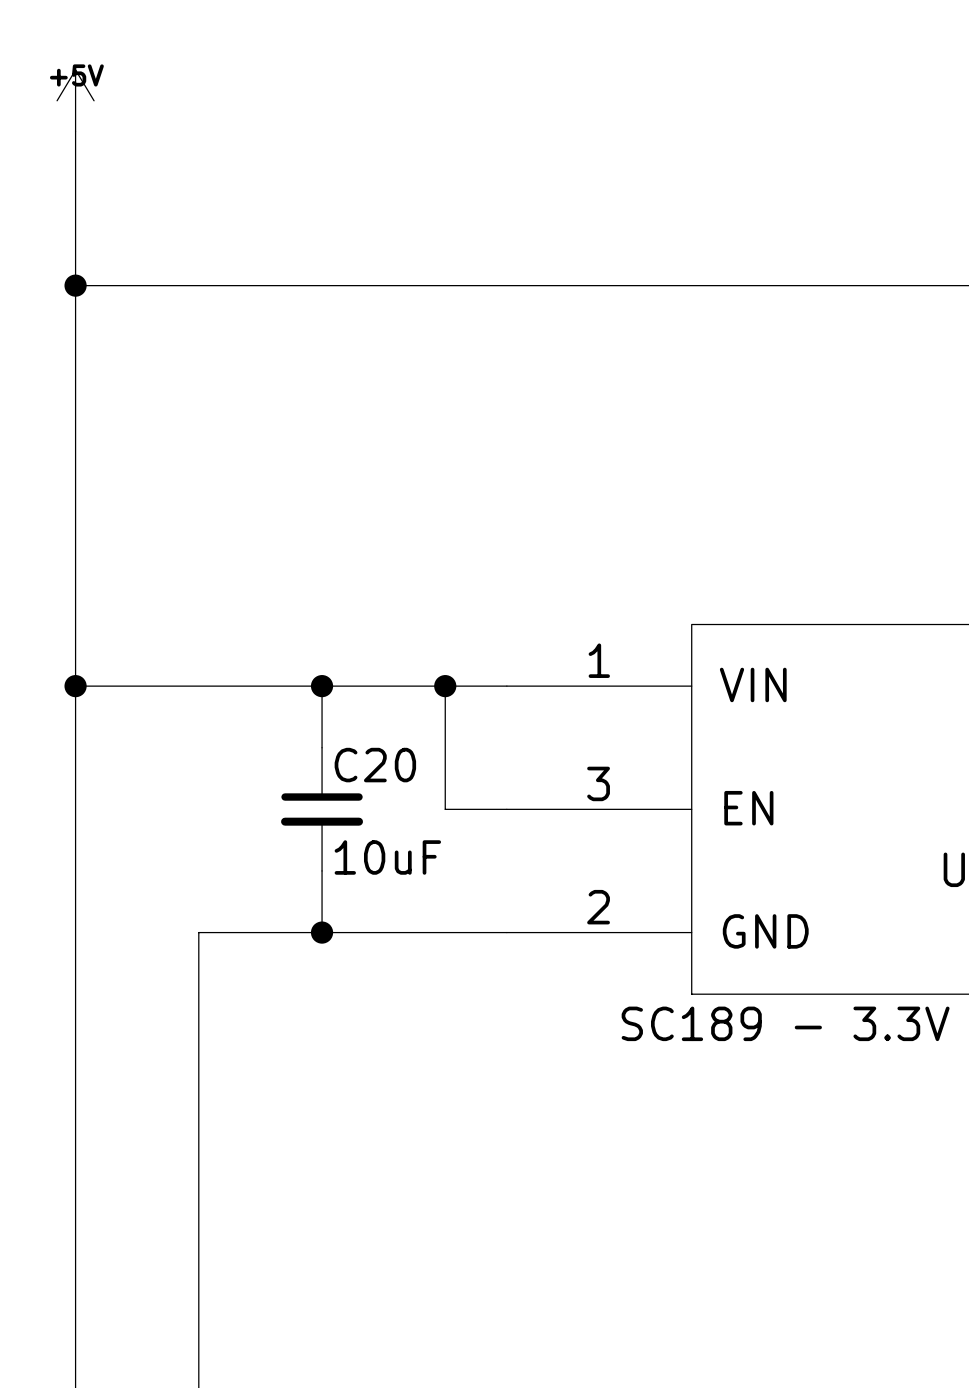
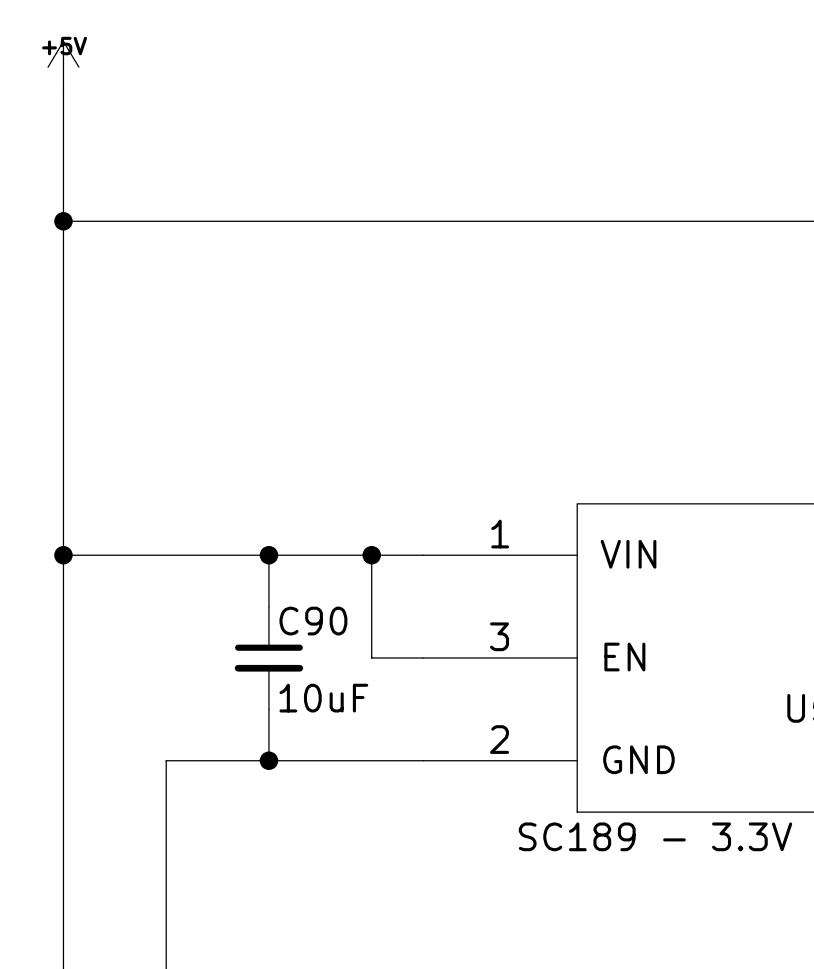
C20 name: C20 (375, 765) -> C90 (313, 621)

